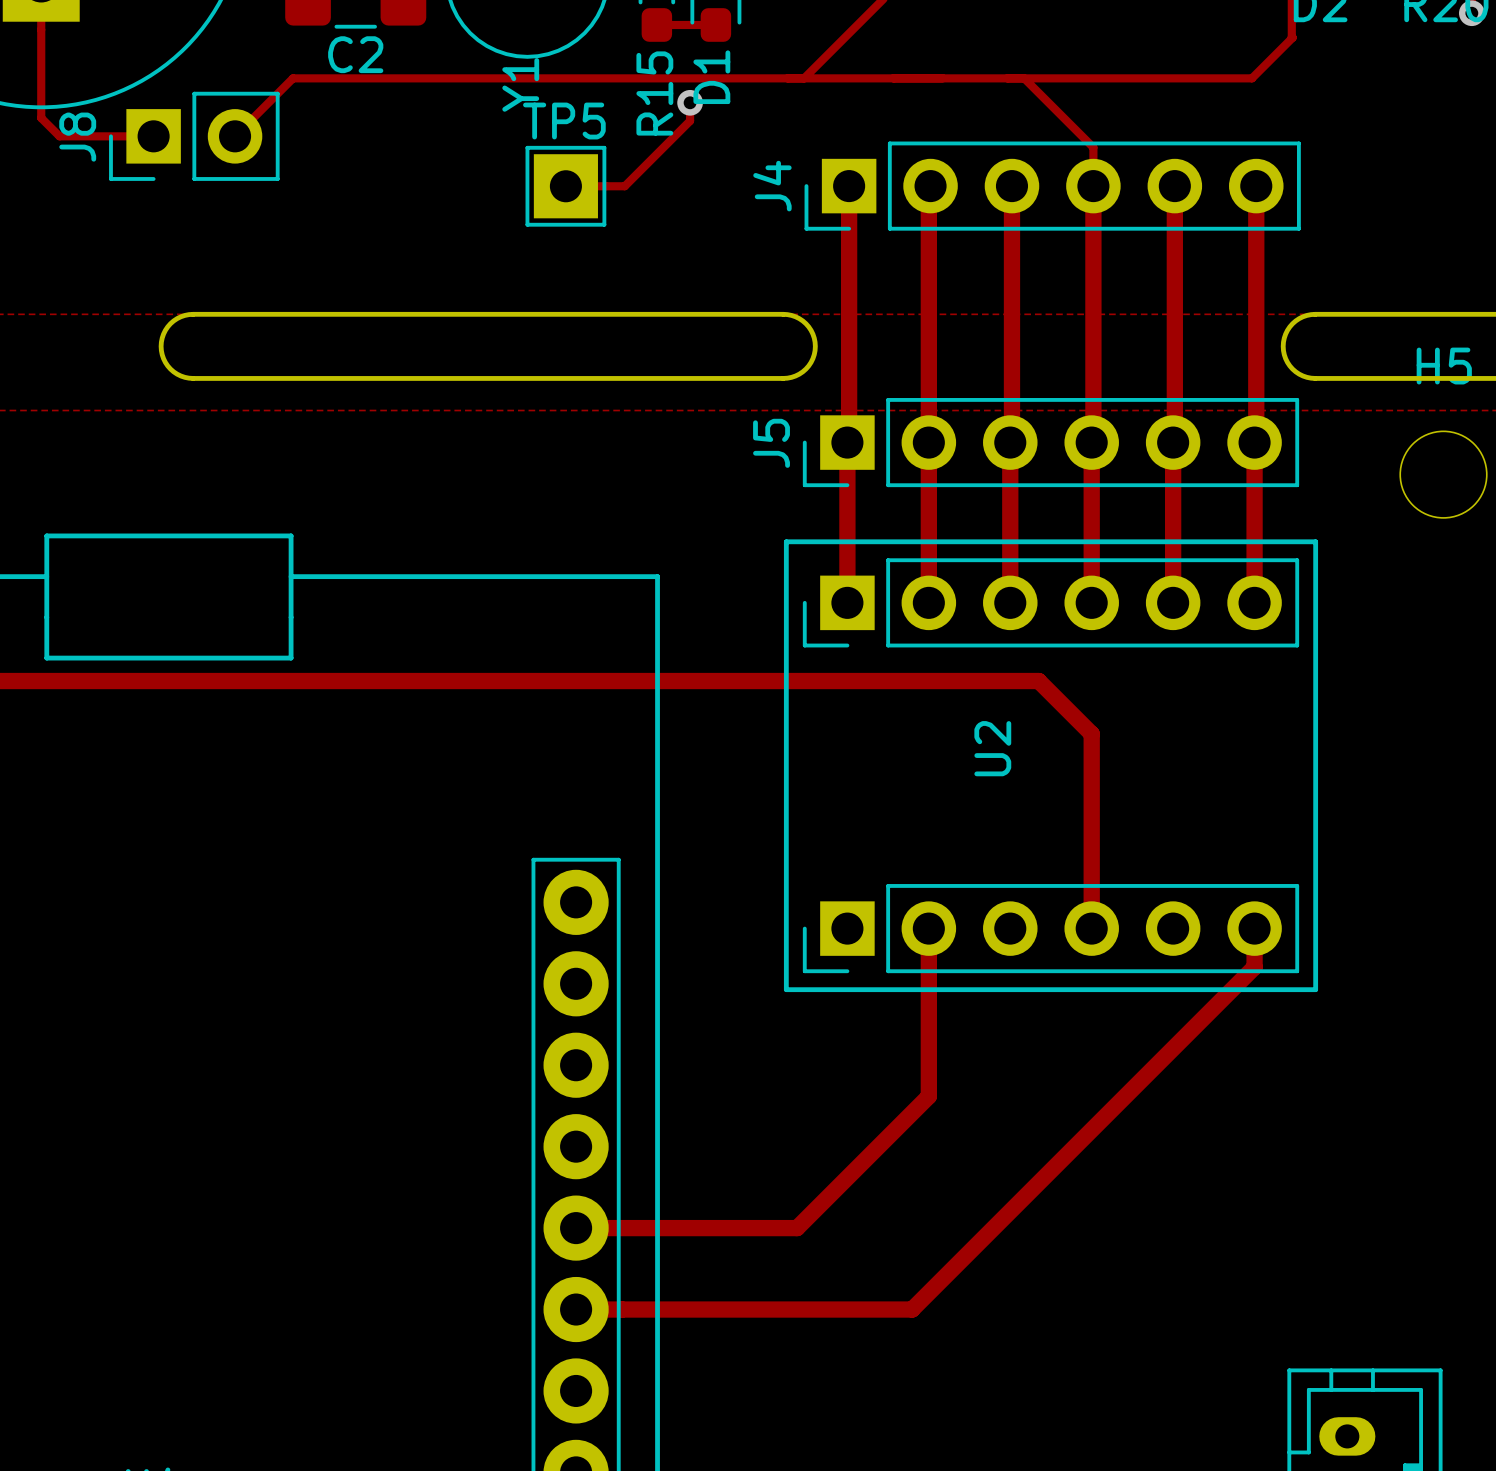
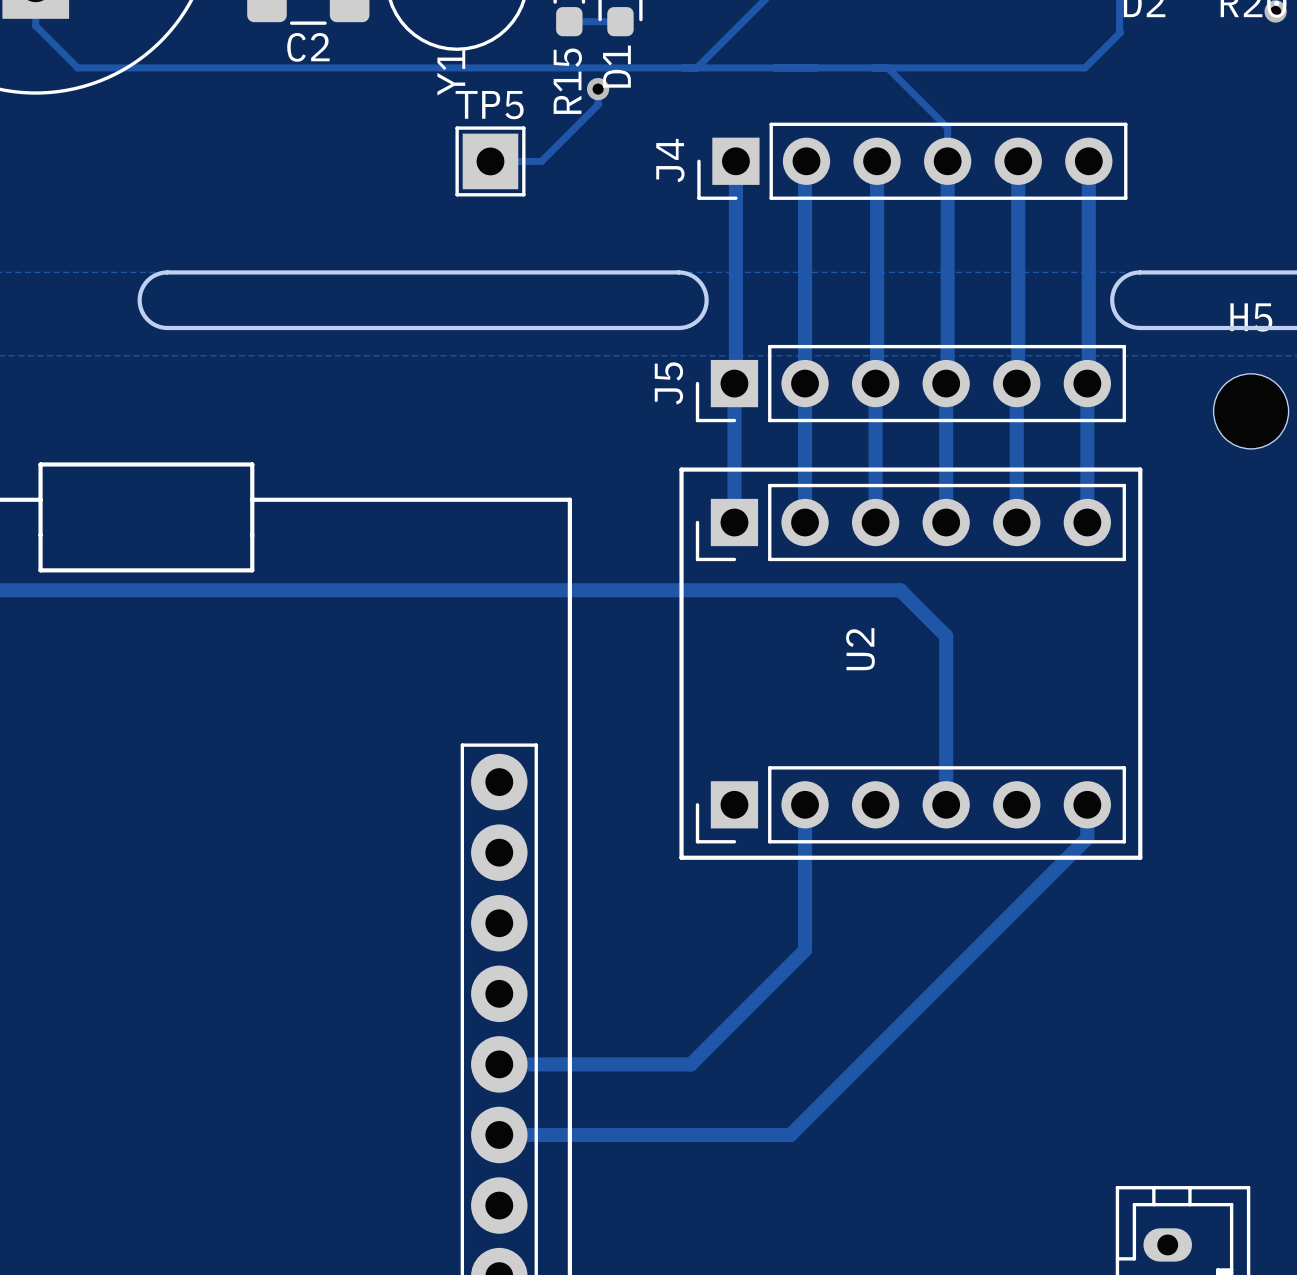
track: (41, 29) (41, 118) (59, 136) (153, 136) -> (35, 25) (77, 67) (253, 67)
track: (293, 78) (235, 136) -> none
J8: (194, 136) -> none

